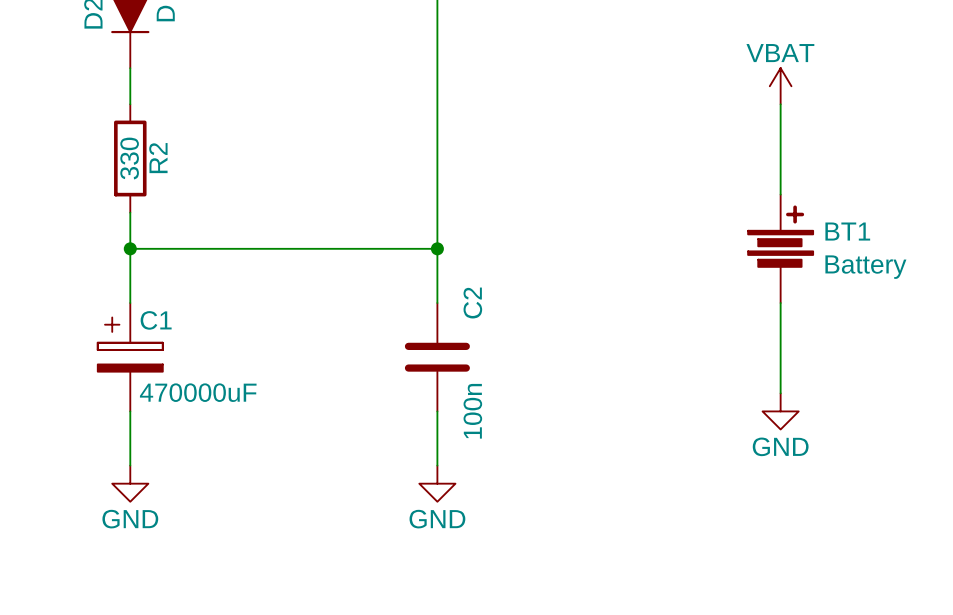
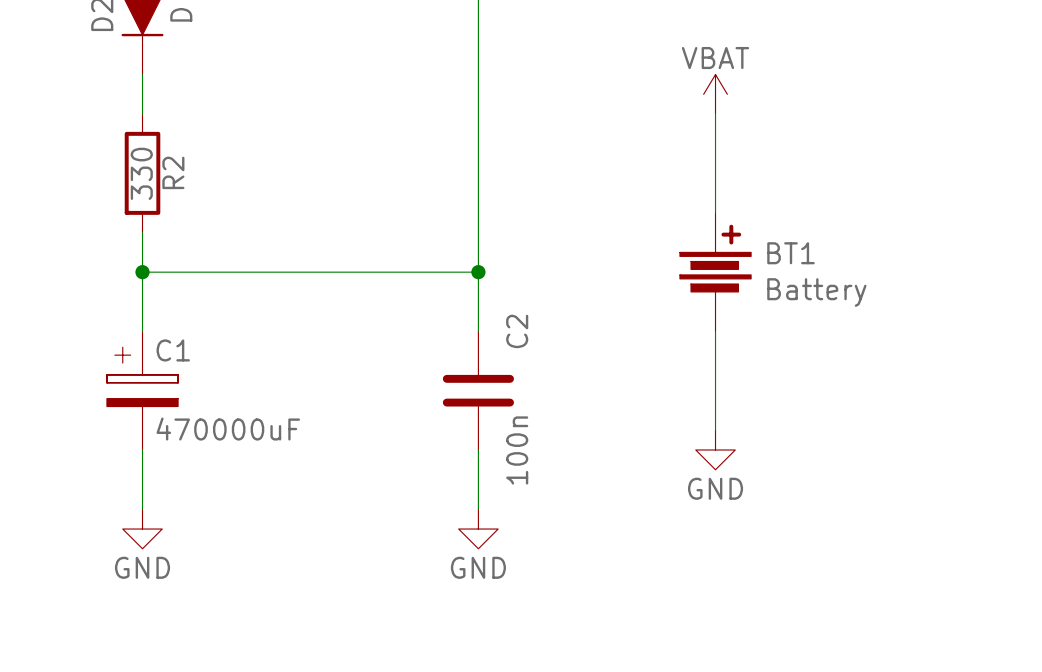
power symbol position: VBAT (780, 86) -> VBAT (715, 94)
wire: (780, 104) (780, 194) -> (715, 114) (715, 212)
BT1 position: (780, 248) -> (715, 272)
wire: (780, 303) (780, 393) -> (715, 331) (715, 430)
power symbol position: GND (780, 411) -> GND (715, 449)

